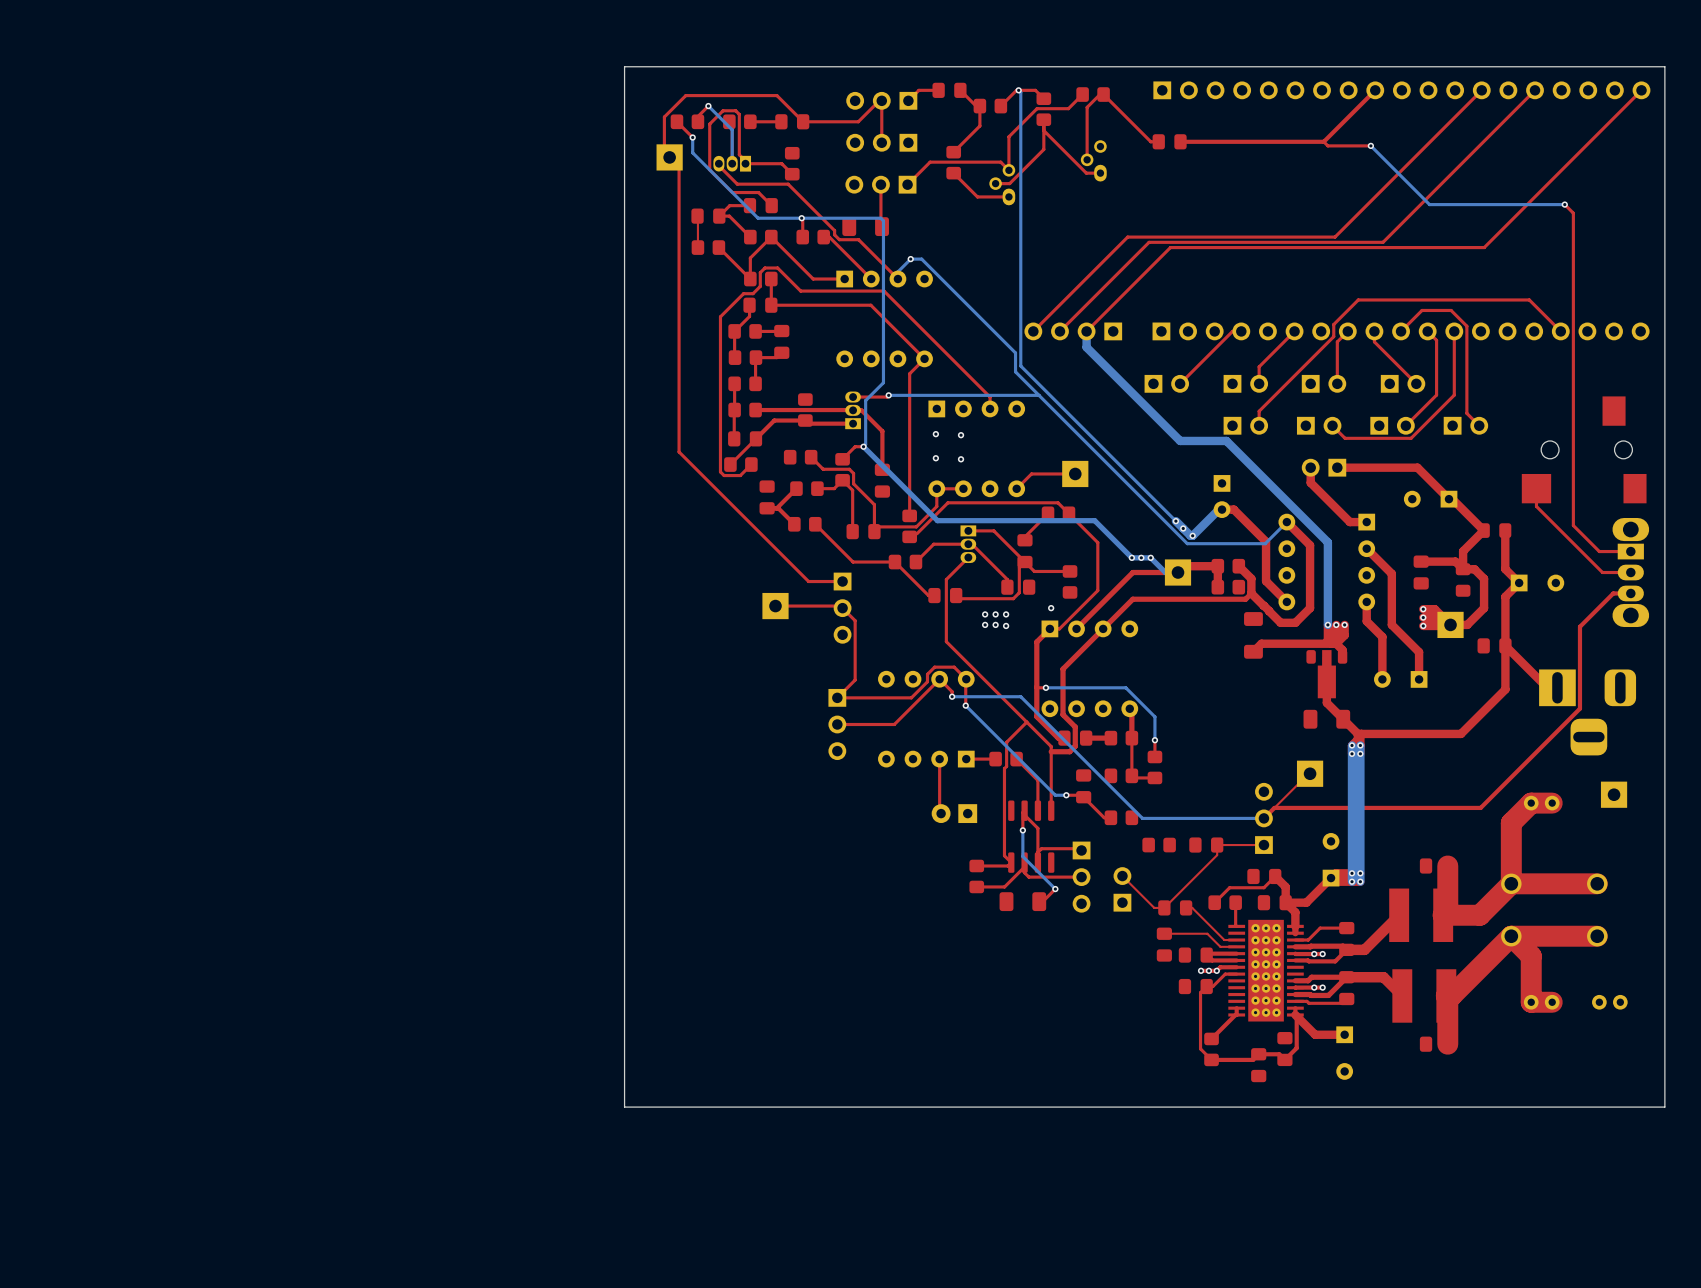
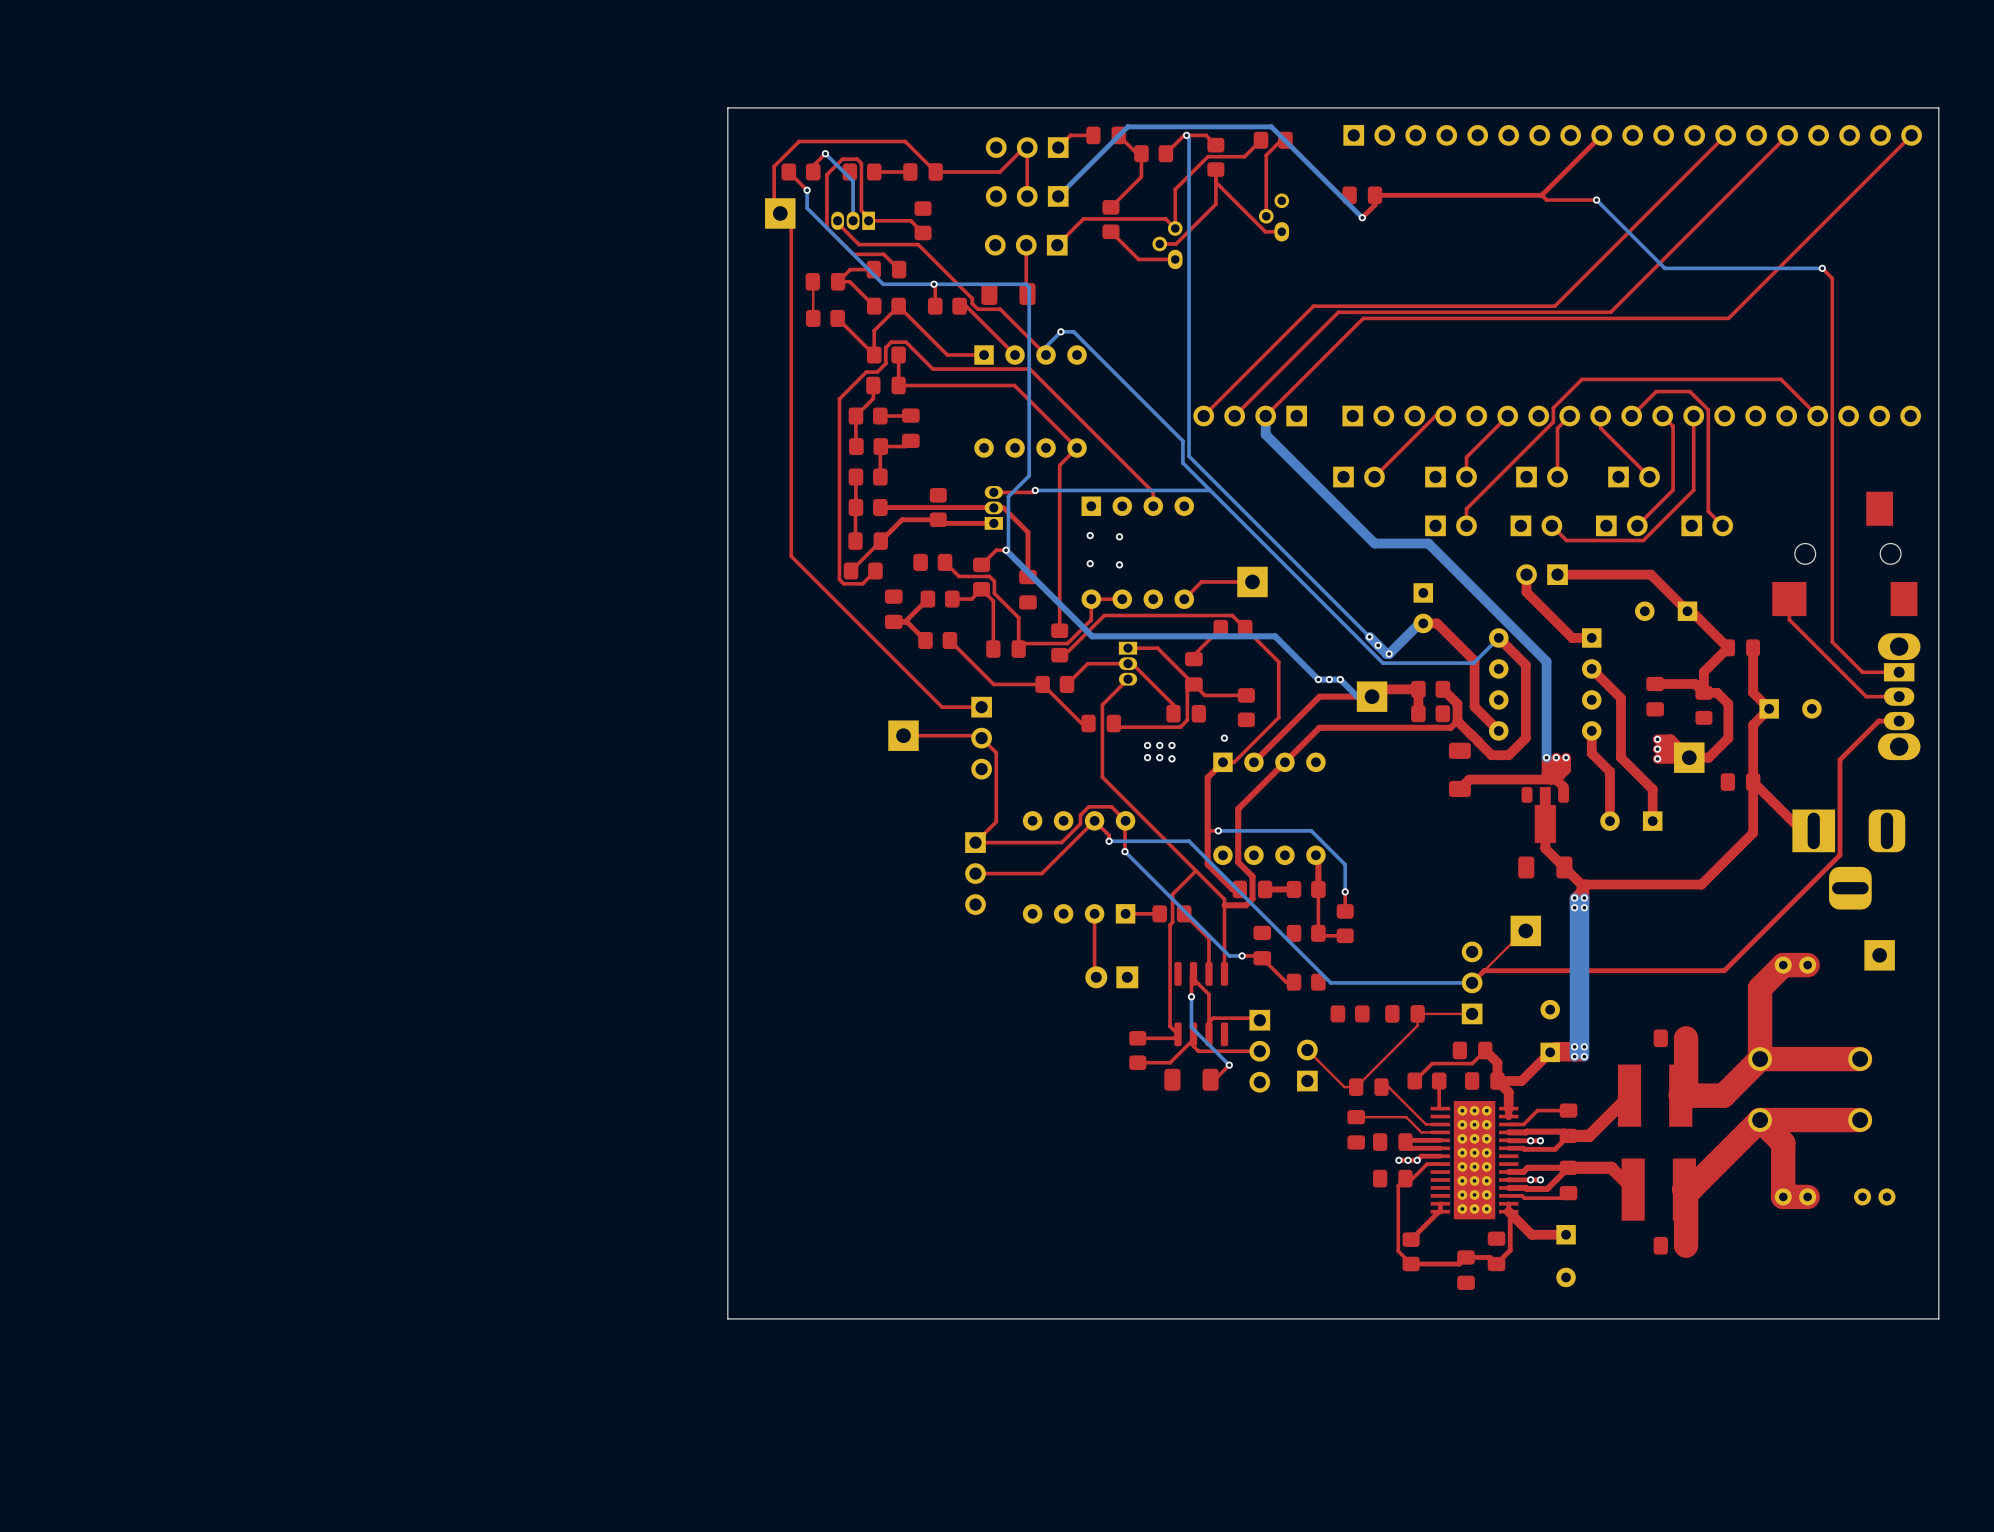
top track: none -> (1374, 195) (1374, 205) (1362, 217)
bottom track: none -> (1058, 196) (1127, 126) (1271, 126) (1362, 217)
via: none -> (1362, 217)

